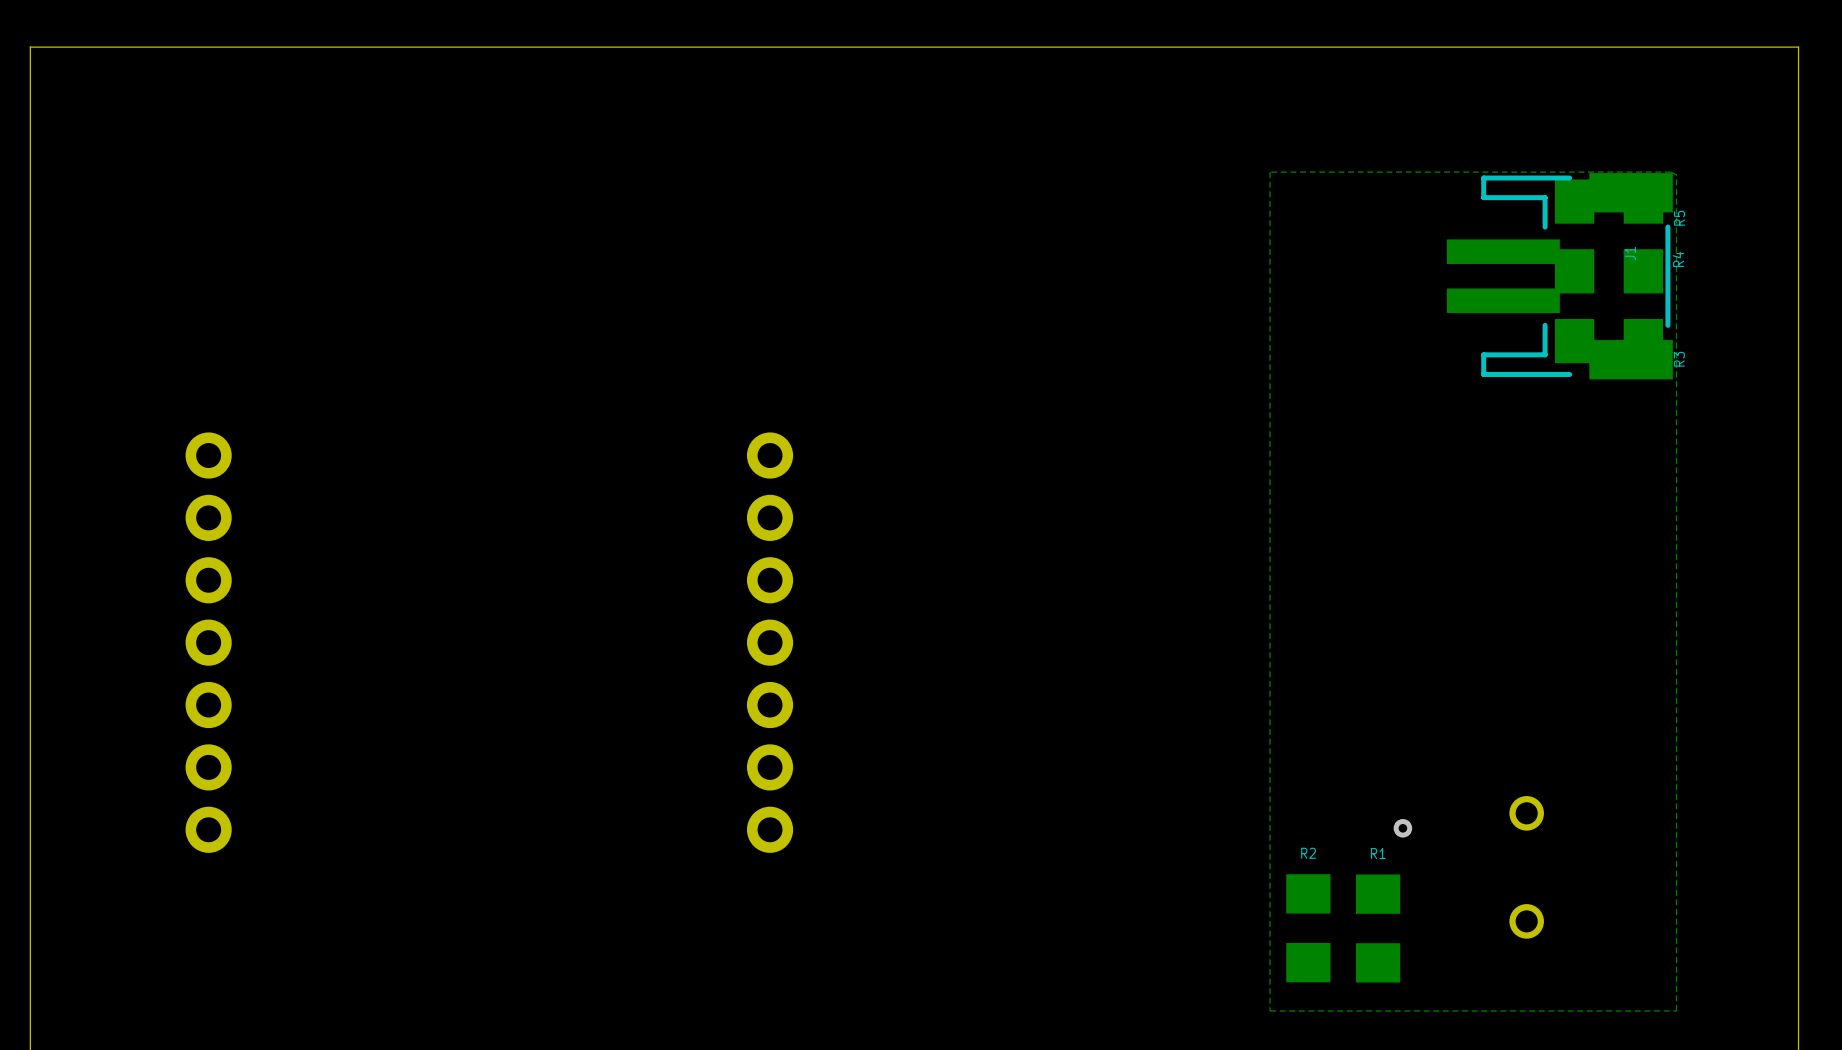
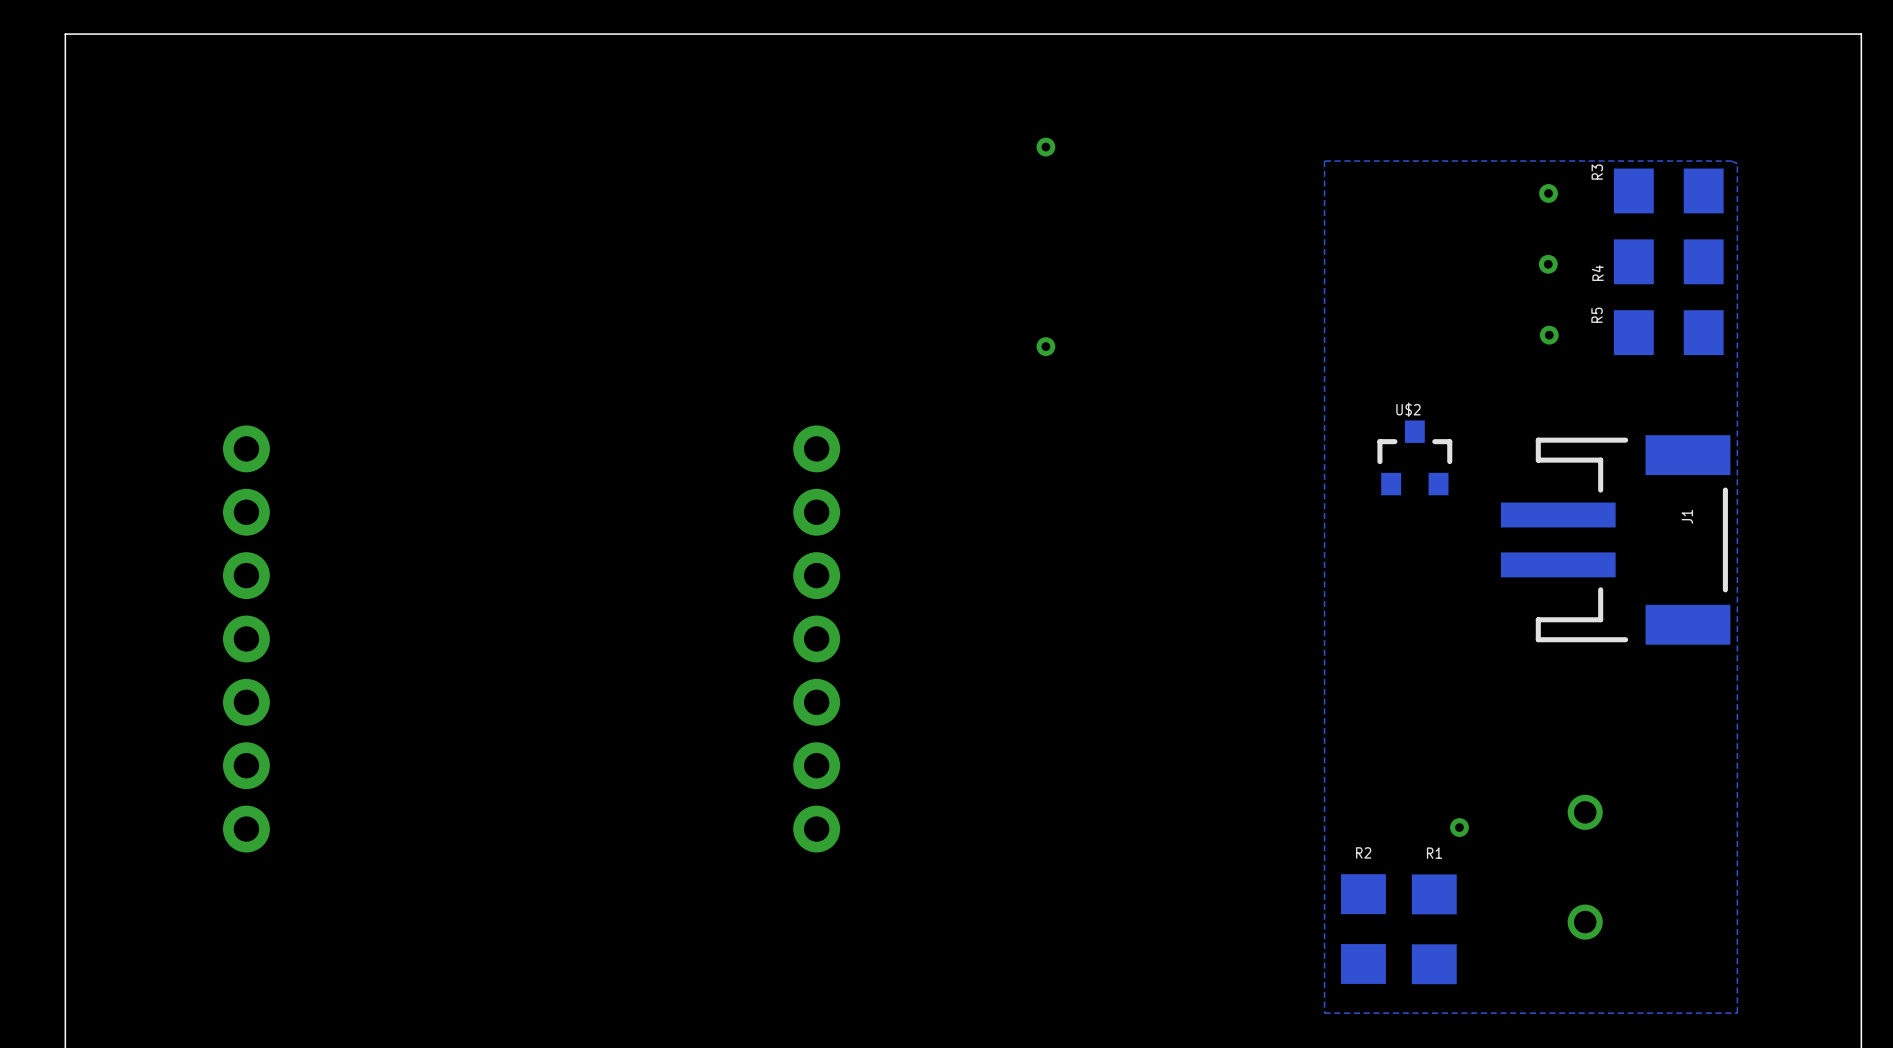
via: none -> (1045, 147)
via: none -> (1548, 193)
R5 name: R5 (1679, 218) -> R3 (1597, 172)
R4 name position: R4 (1678, 259) -> R4 (1597, 273)
via: none -> (1548, 264)
J1 position: (1559, 276) -> (1615, 539)
via: none -> (1549, 335)
via: none -> (1045, 346)
R3 name: R3 (1679, 359) -> R5 (1597, 315)
U$2: none -> (1414, 457)

